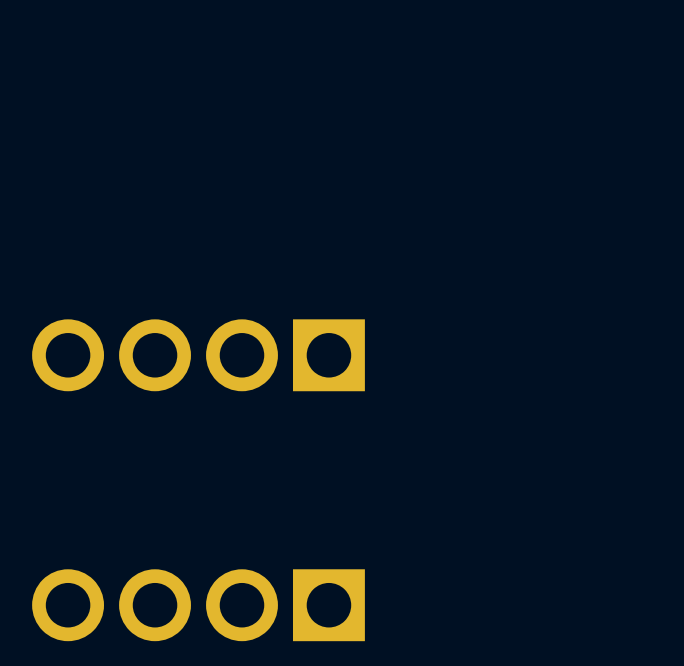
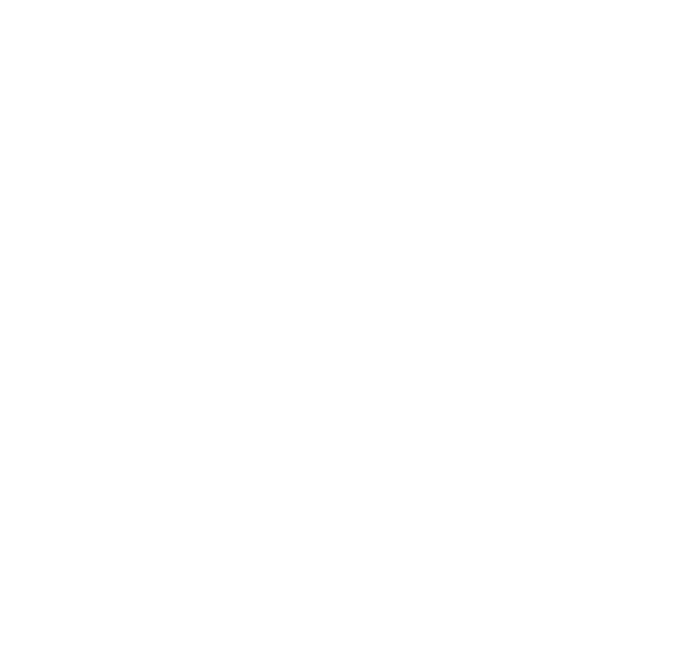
part: (198, 355) -> none
part: (198, 605) -> none

